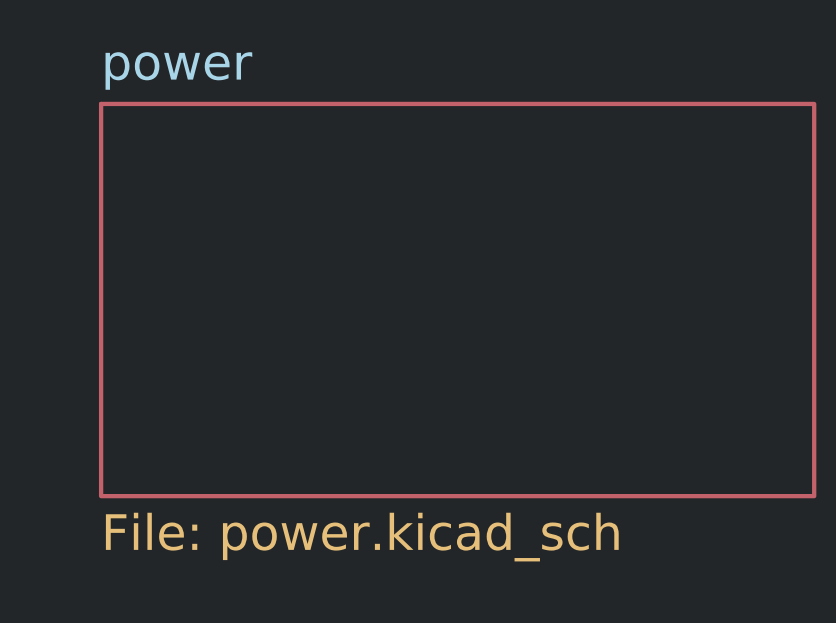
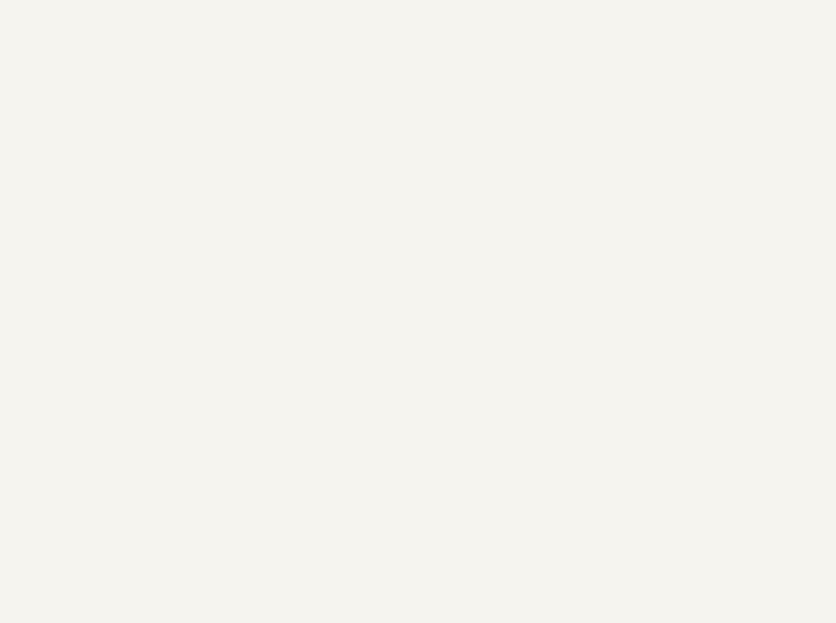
sheet power: File: power.kicad_sch (457, 300) -> none

